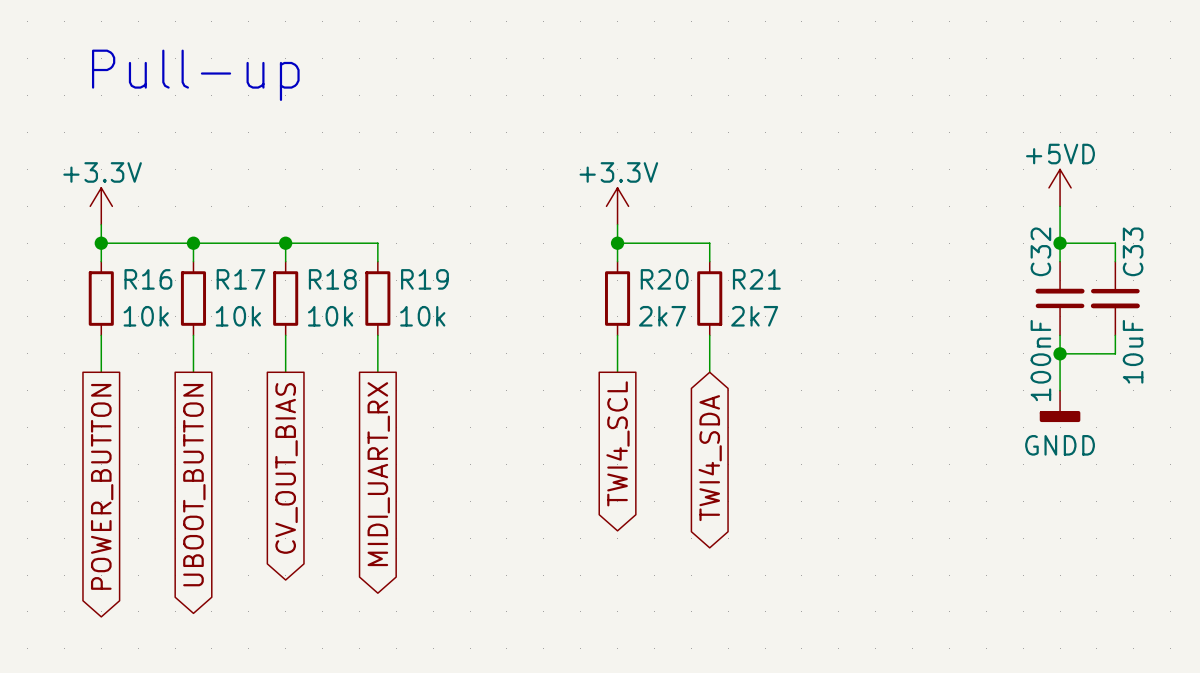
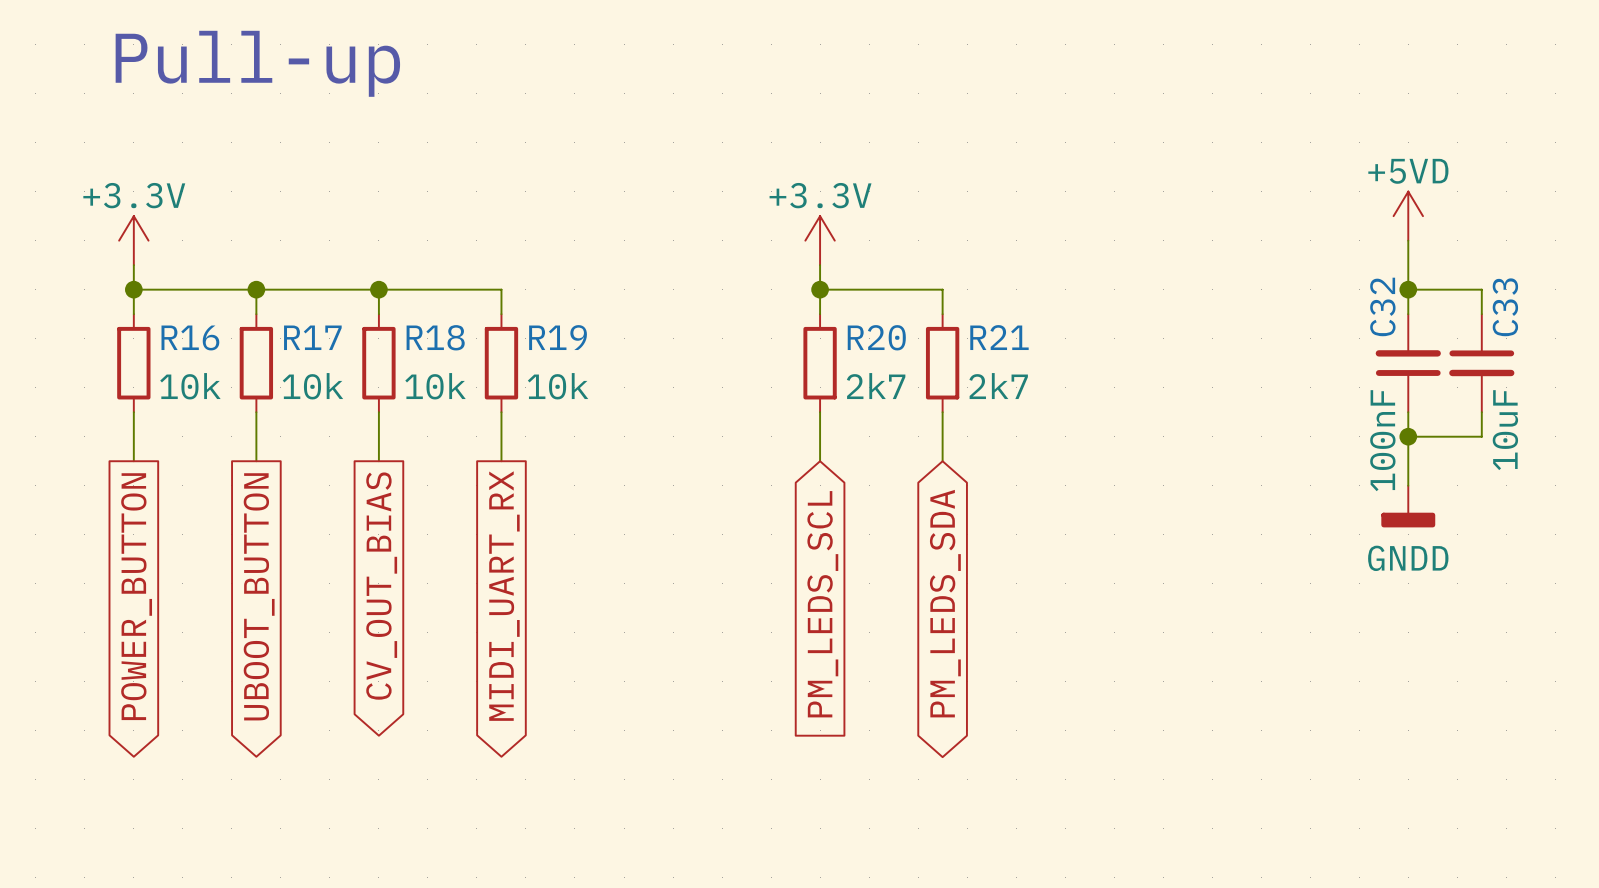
global label shape: output (617, 443) -> input (822, 604)
global label: TWI4_SCL (617, 443) -> PM_LEDS_SCL (822, 604)
global label: TWI4_SDA (710, 458) -> PM_LEDS_SDA (945, 603)

